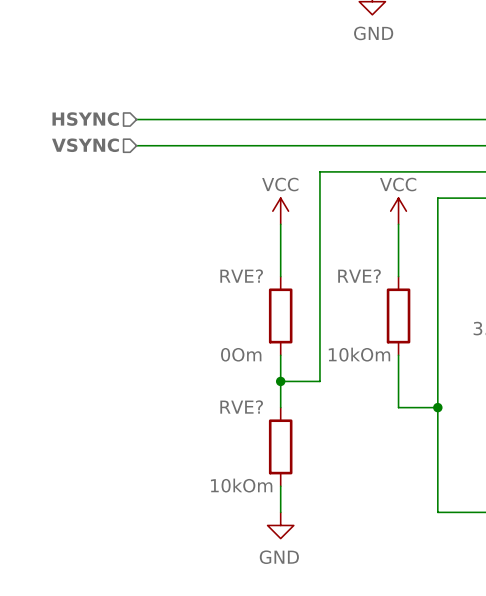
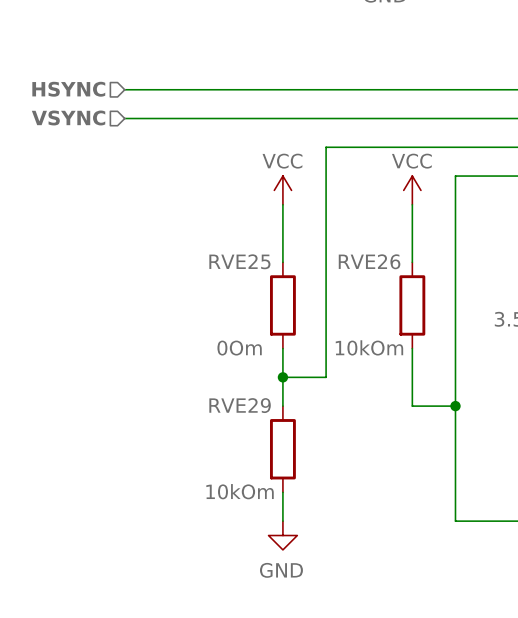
RVE? name: RVE? (241, 276) -> RVE25 (239, 261)
RVE? name: RVE? (359, 276) -> RVE26 (369, 261)
RVE? name: RVE? (241, 407) -> RVE29 (240, 405)

